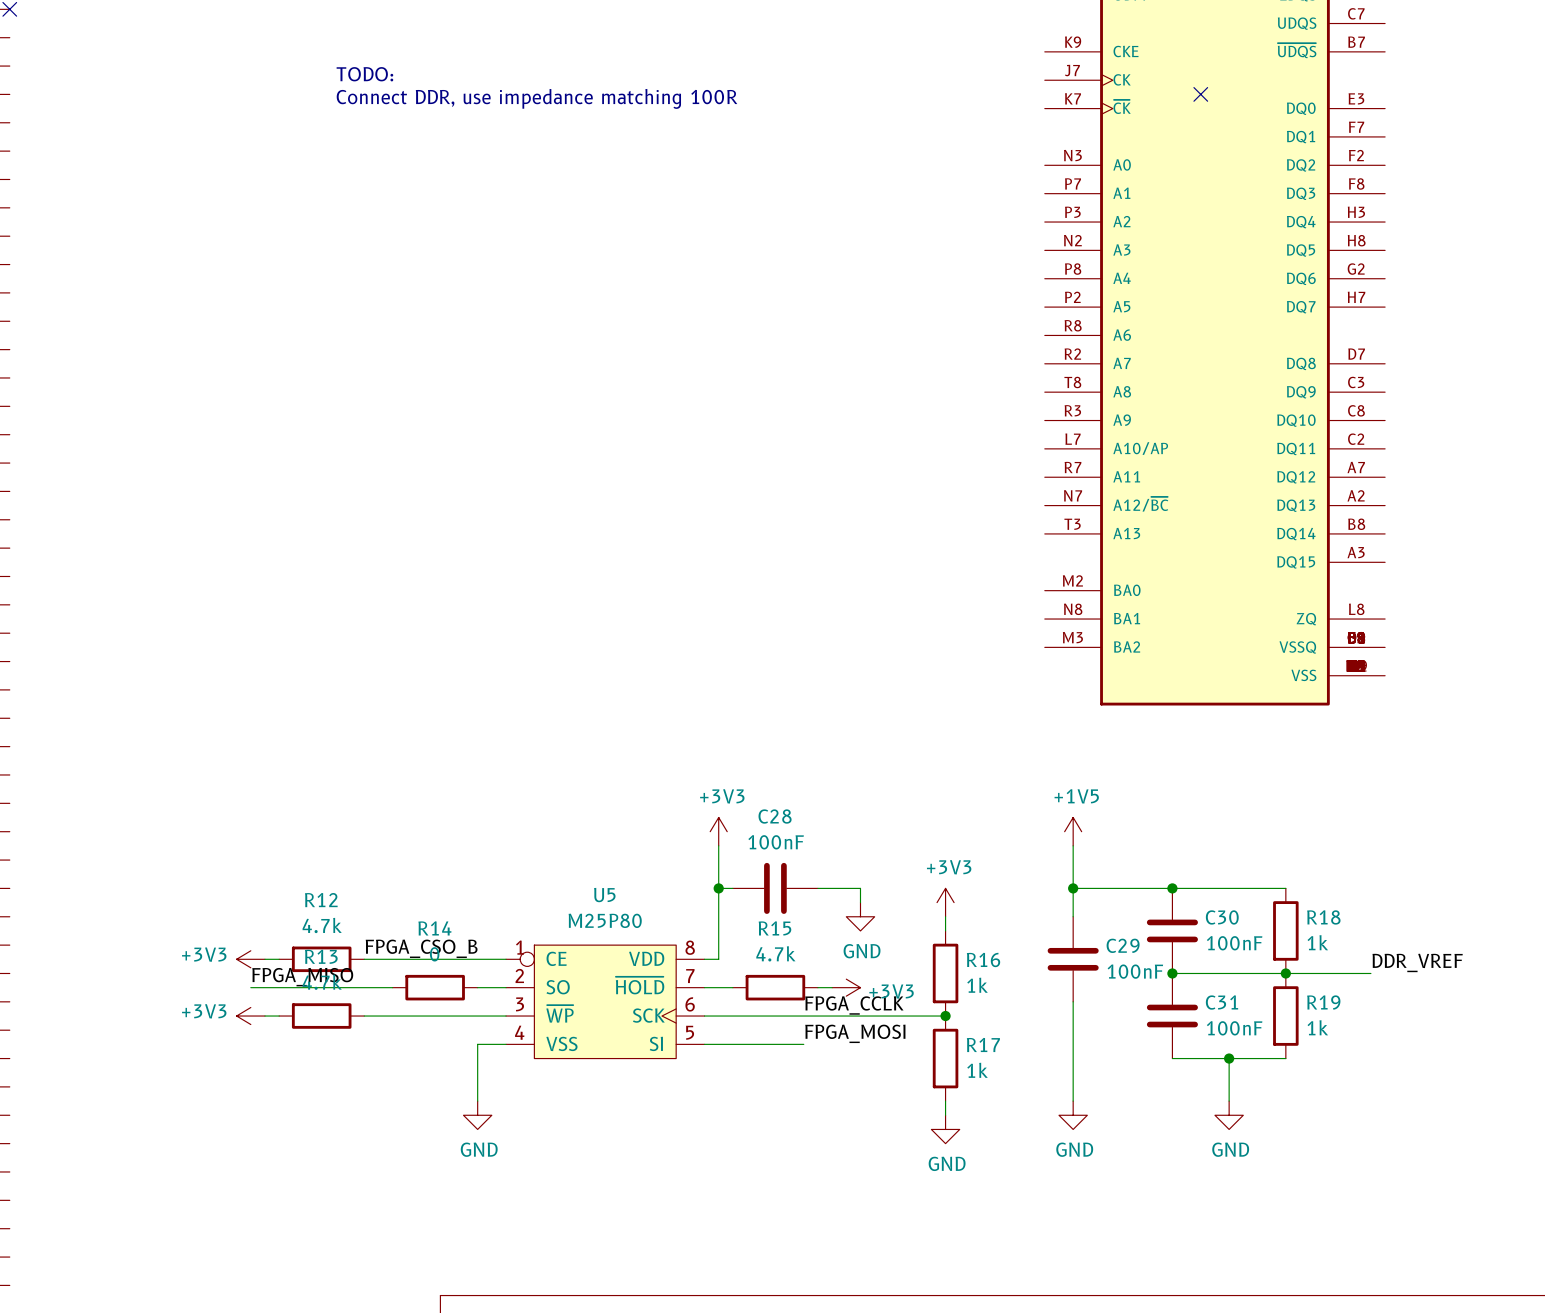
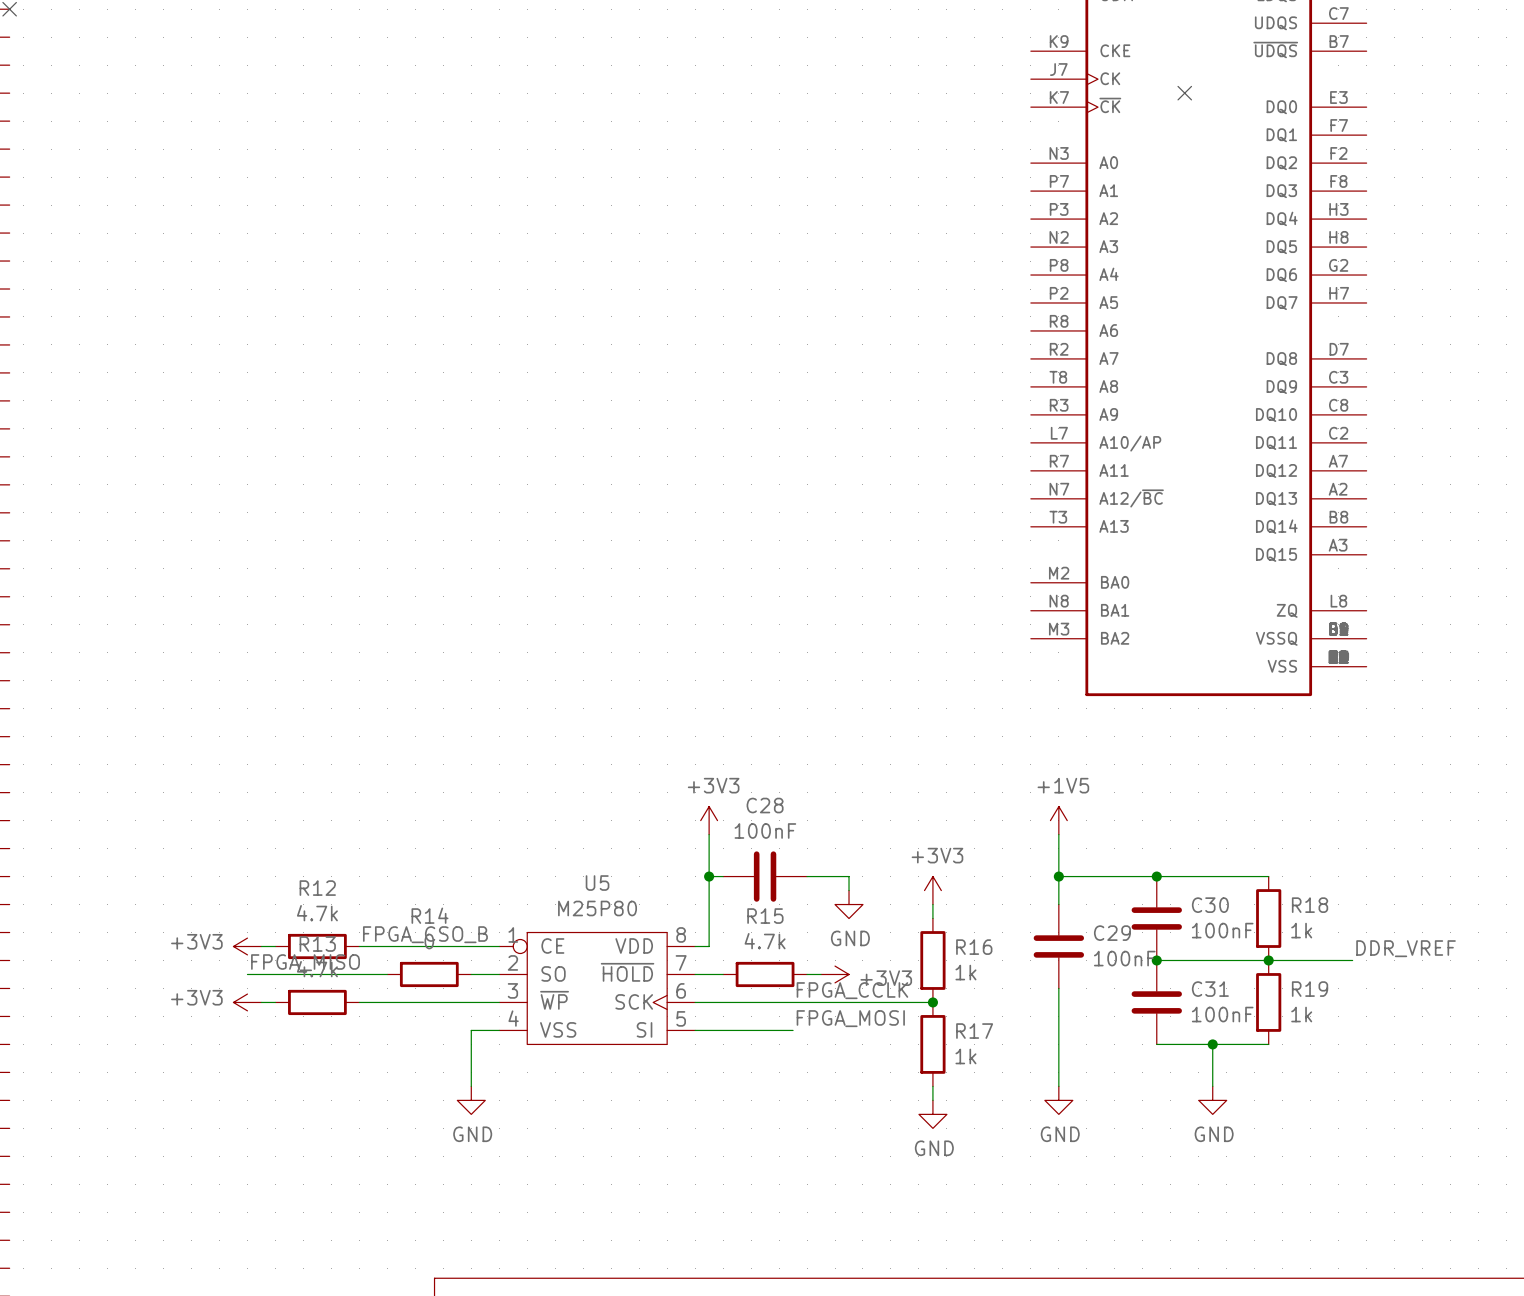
text: TODO: (364, 74) -> none
text: Connect DDR, use impedance matching 100R (537, 98) -> none

